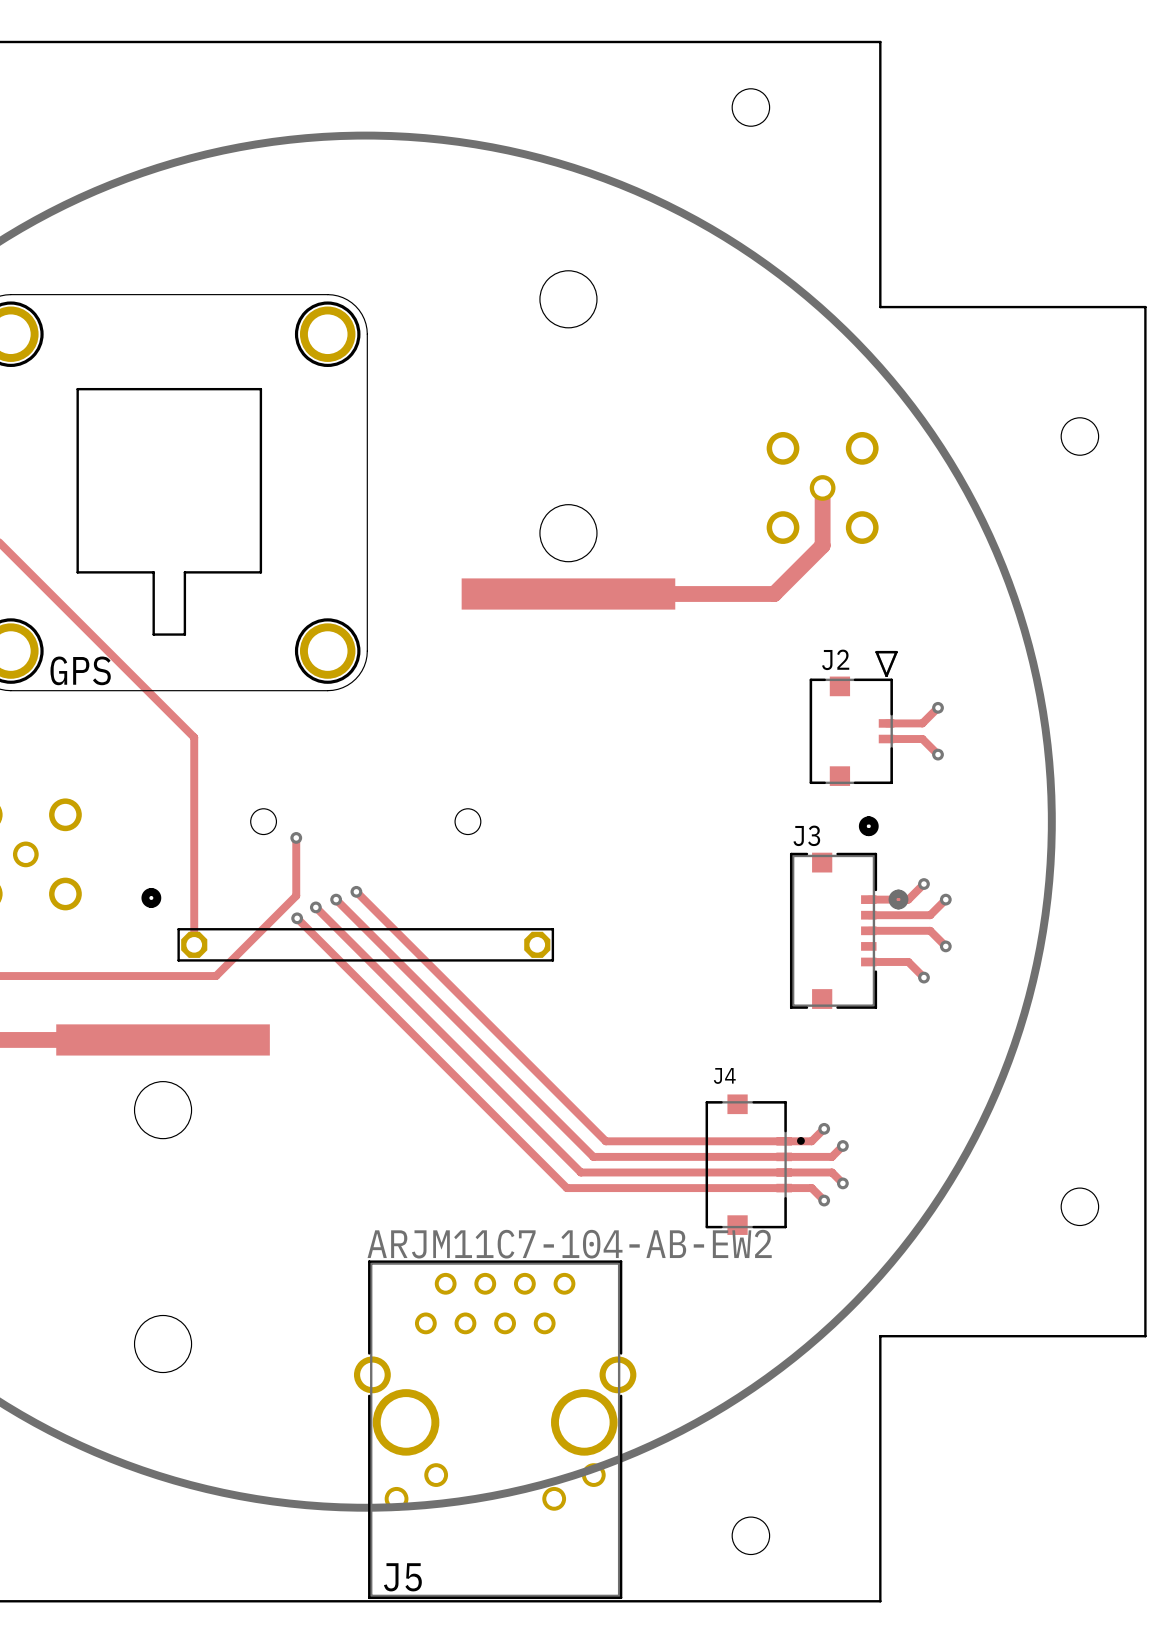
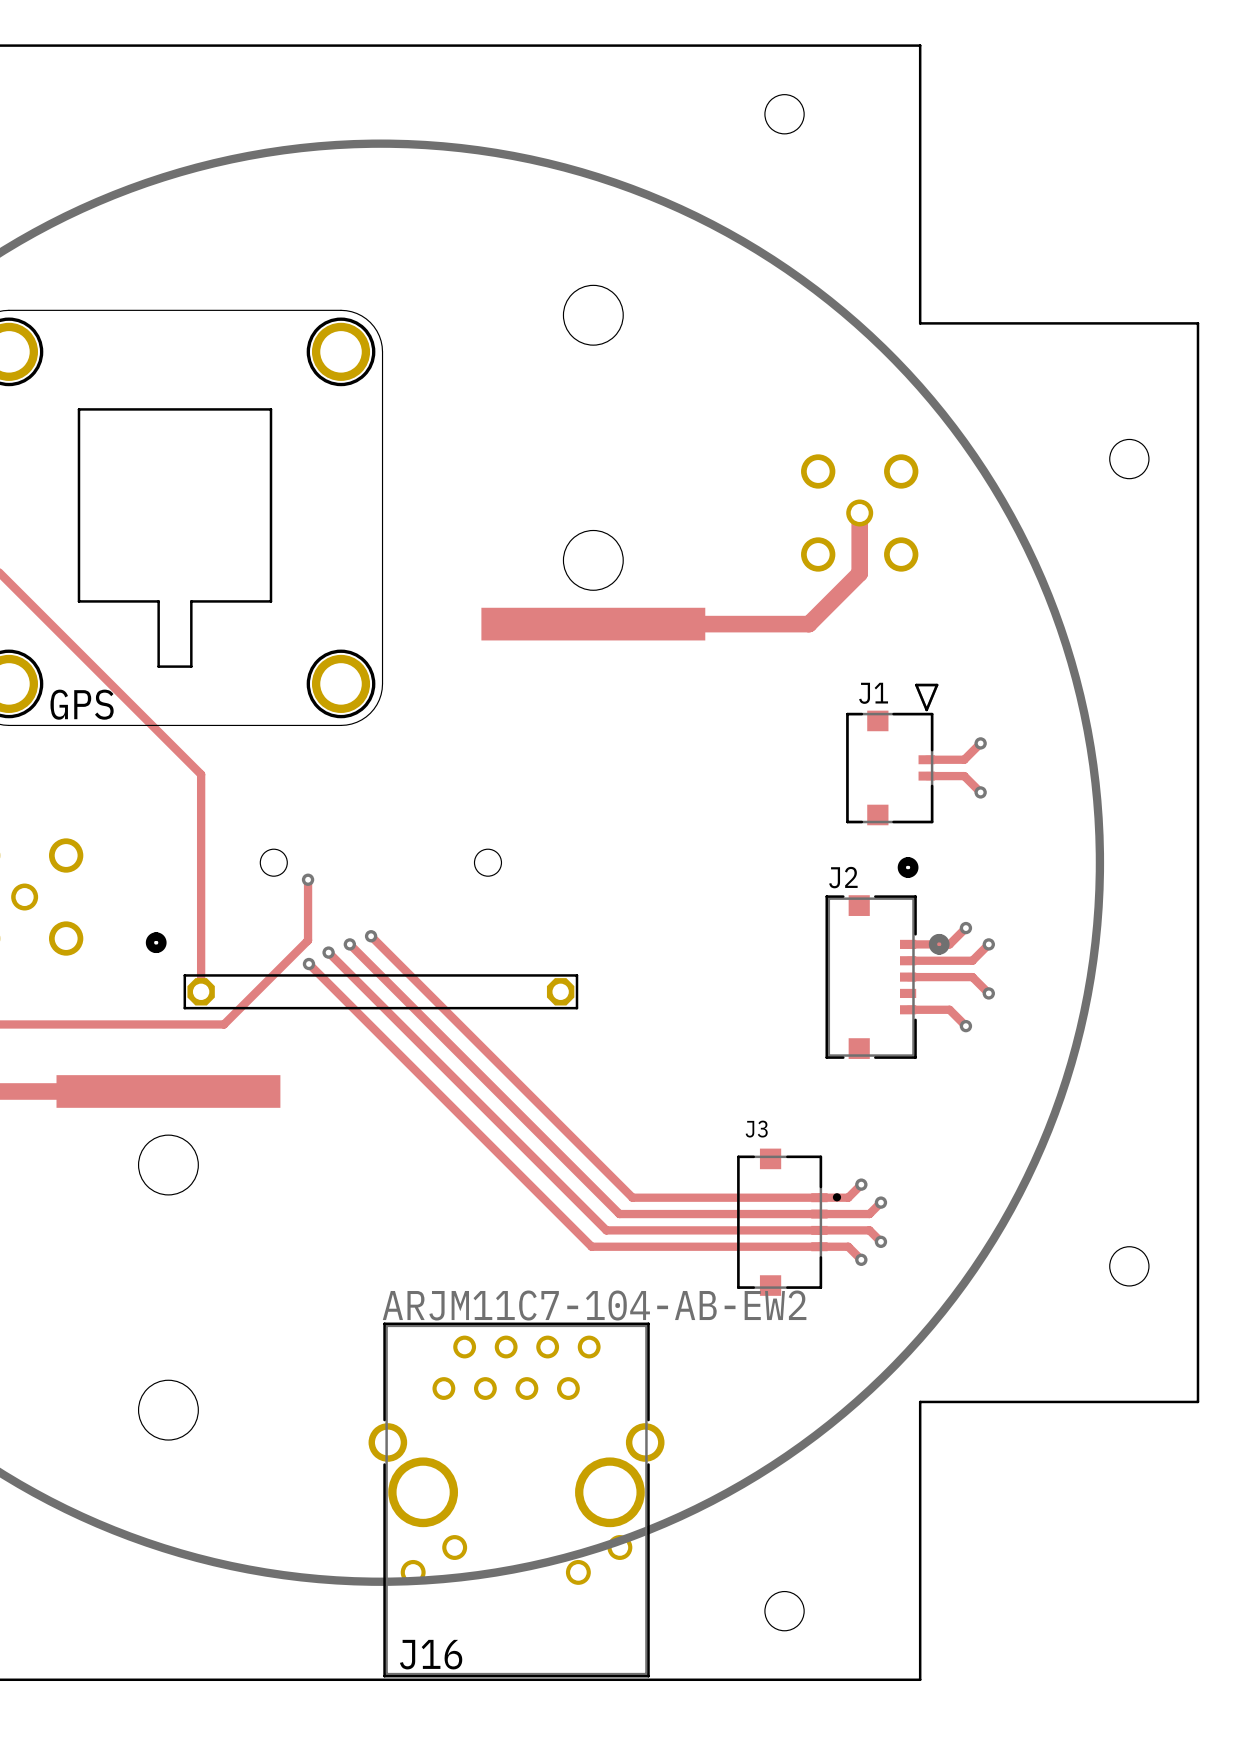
J2 name: J2 (835, 659) -> J1 (873, 693)
J3 name: J3 (806, 835) -> J2 (843, 877)
J4 name: J4 (724, 1075) -> J3 (756, 1129)
J5 name: J5 (402, 1577) -> J16 (431, 1654)

